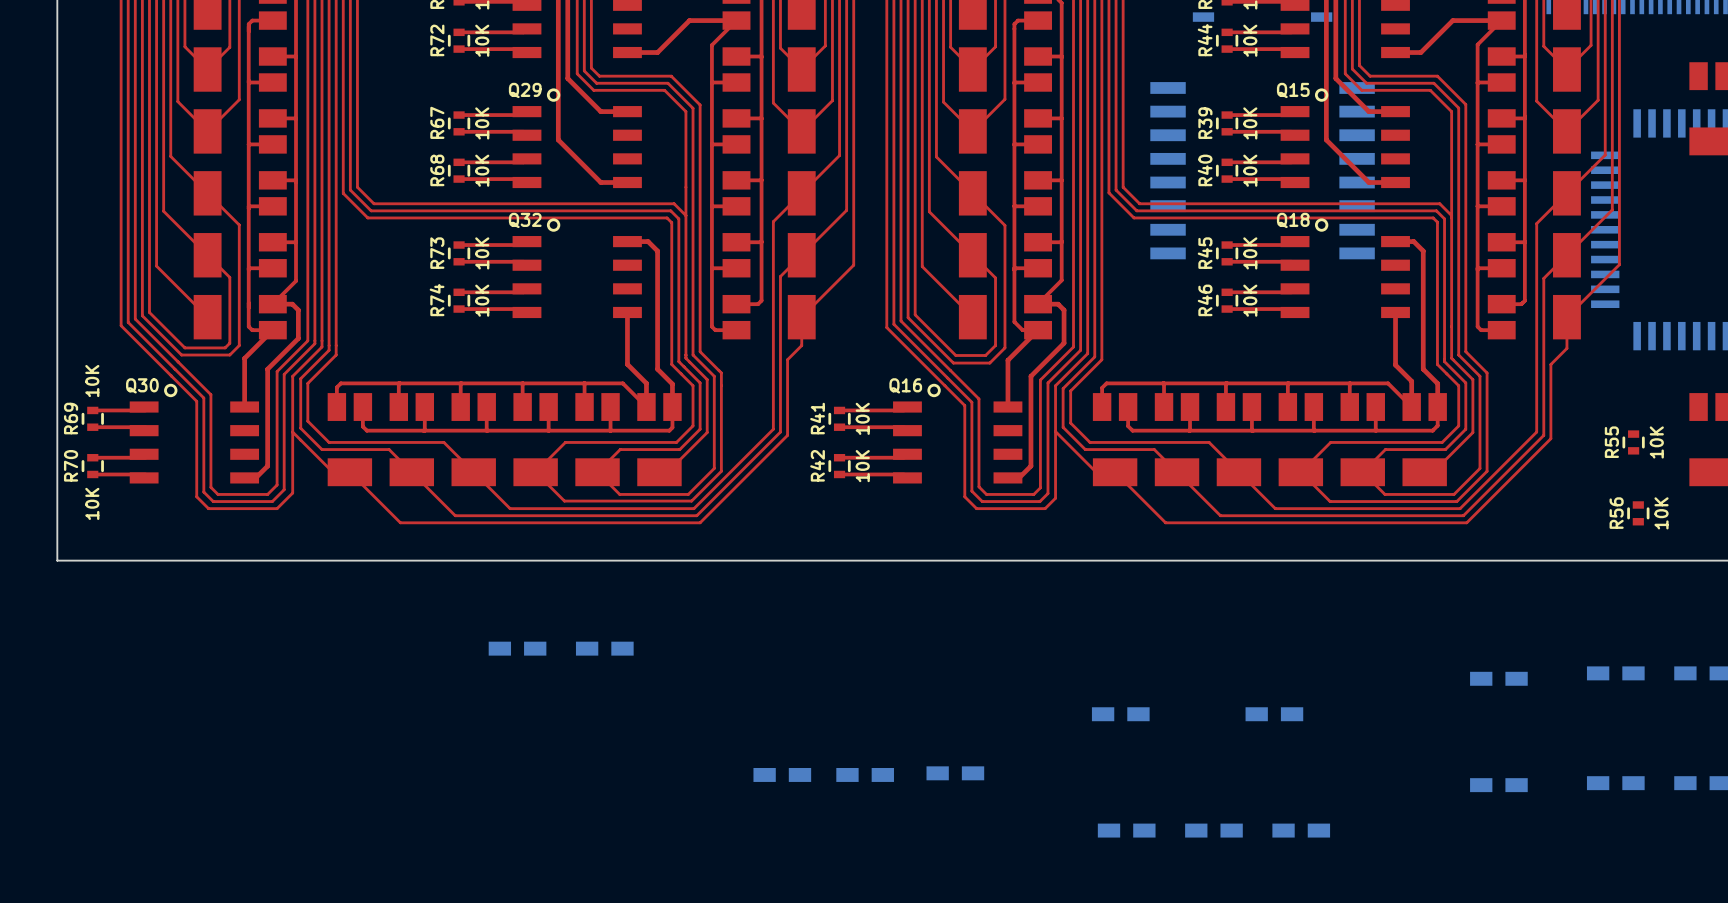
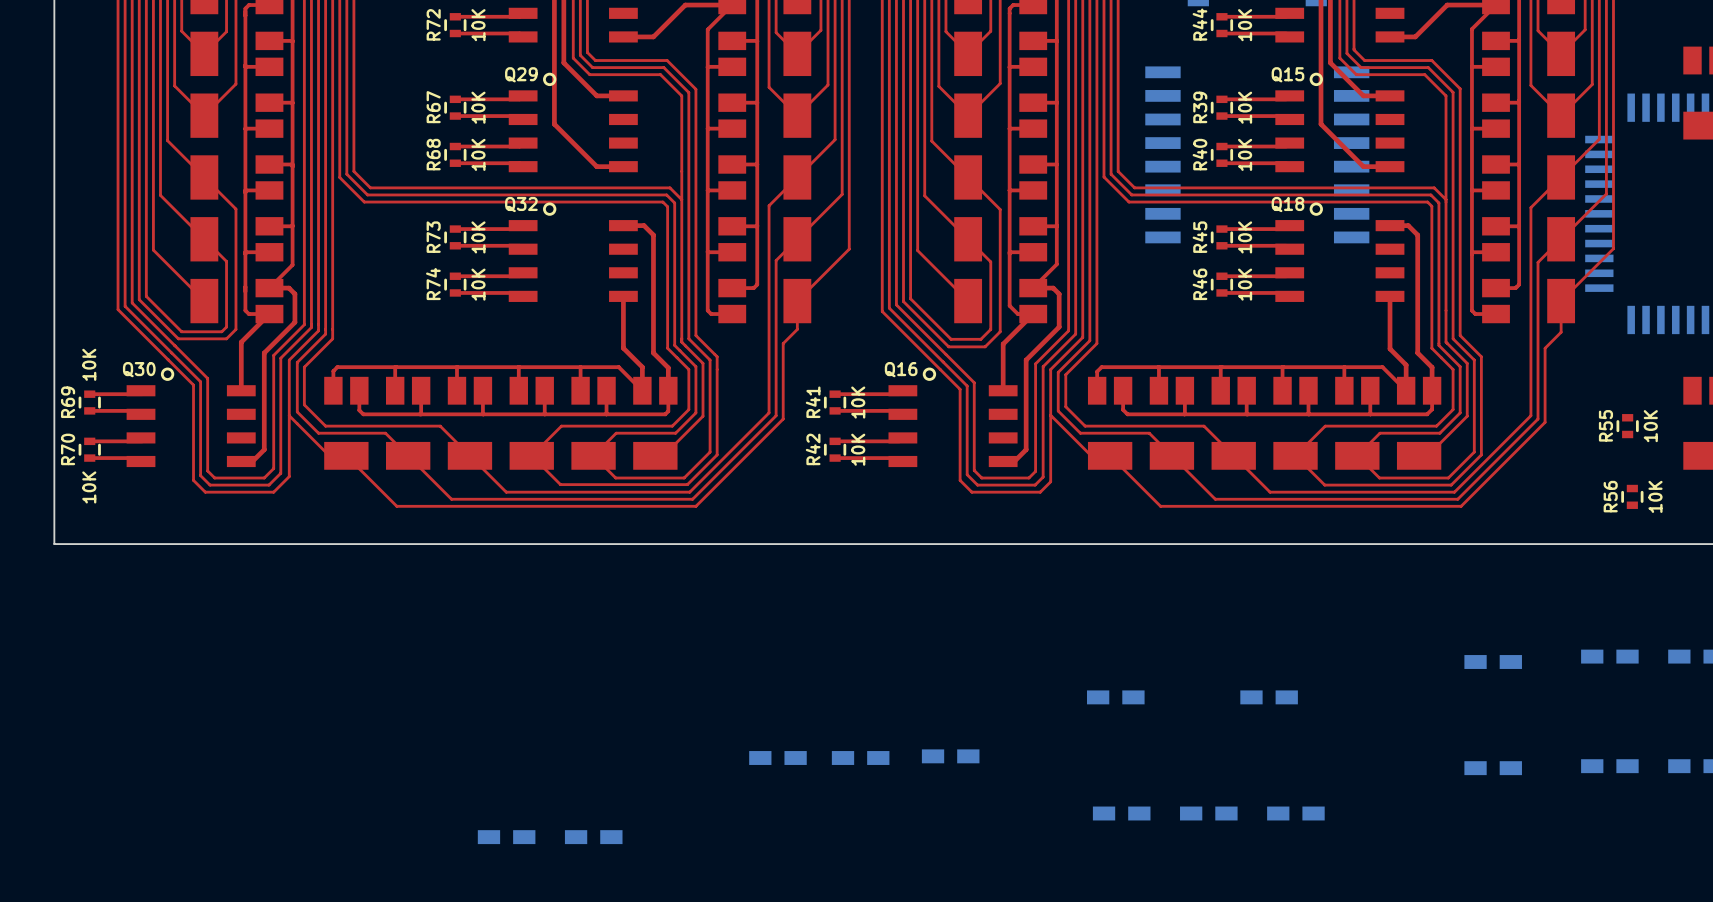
part: (517, 648) -> none
part: (604, 648) -> none
part: none -> (506, 837)
part: none -> (593, 837)

